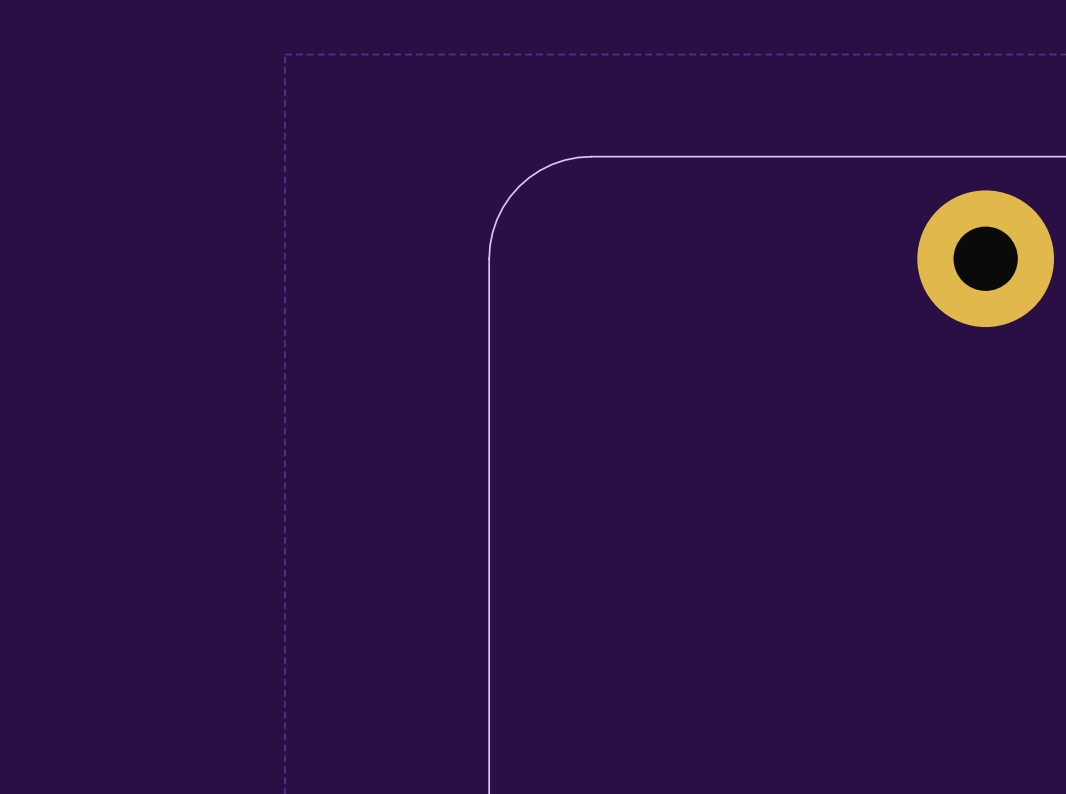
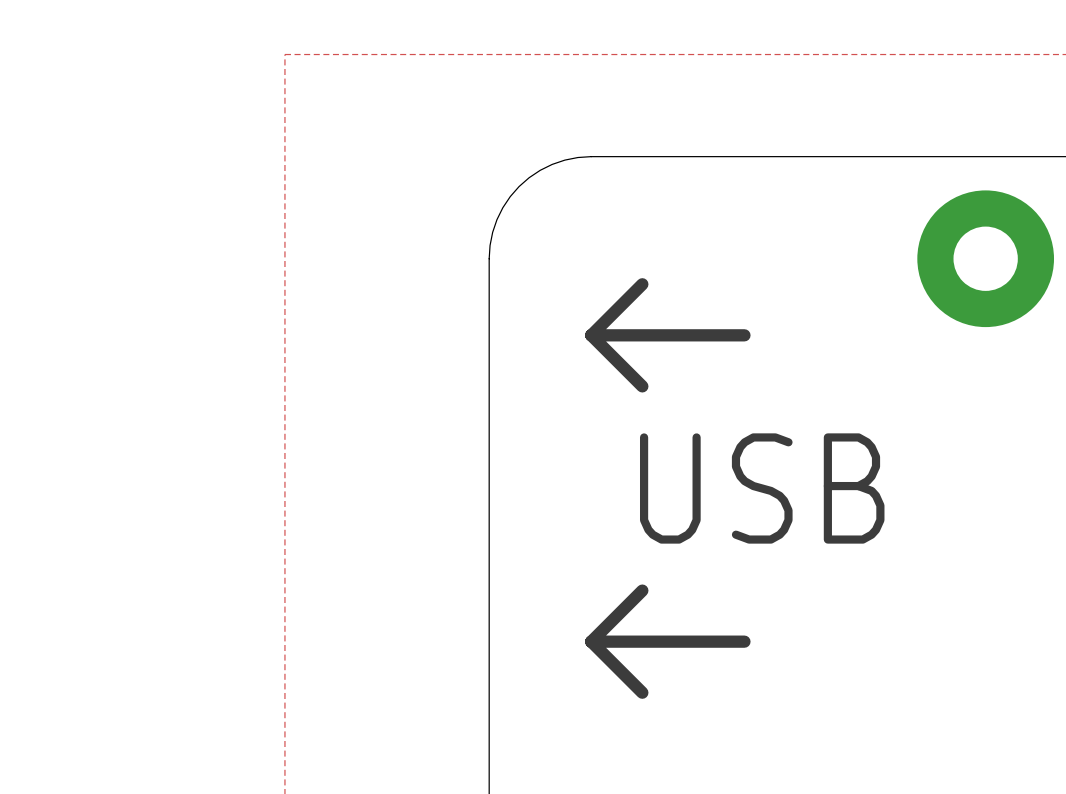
line: none -> (642, 284) (591, 335)
line: none -> (591, 335) (744, 335)
line: none -> (591, 335) (642, 386)
text: none -> USB (762, 488)
line: none -> (642, 590) (591, 641)
line: none -> (591, 641) (744, 641)
line: none -> (591, 641) (642, 692)

